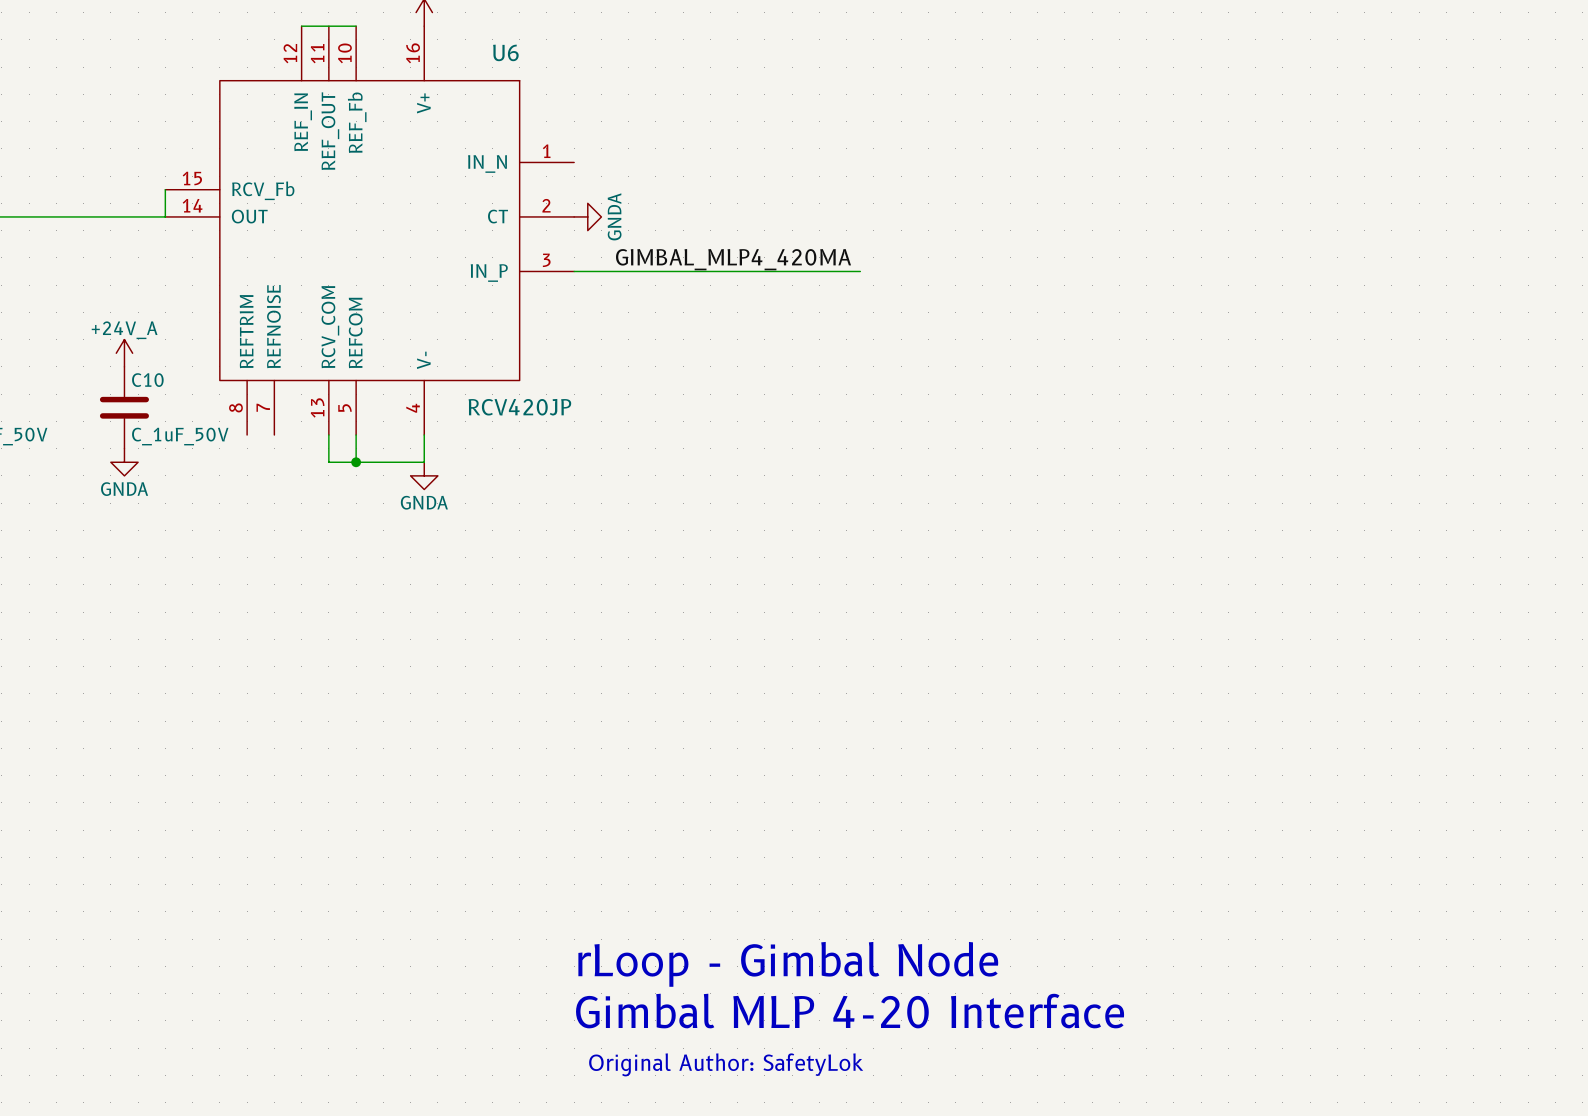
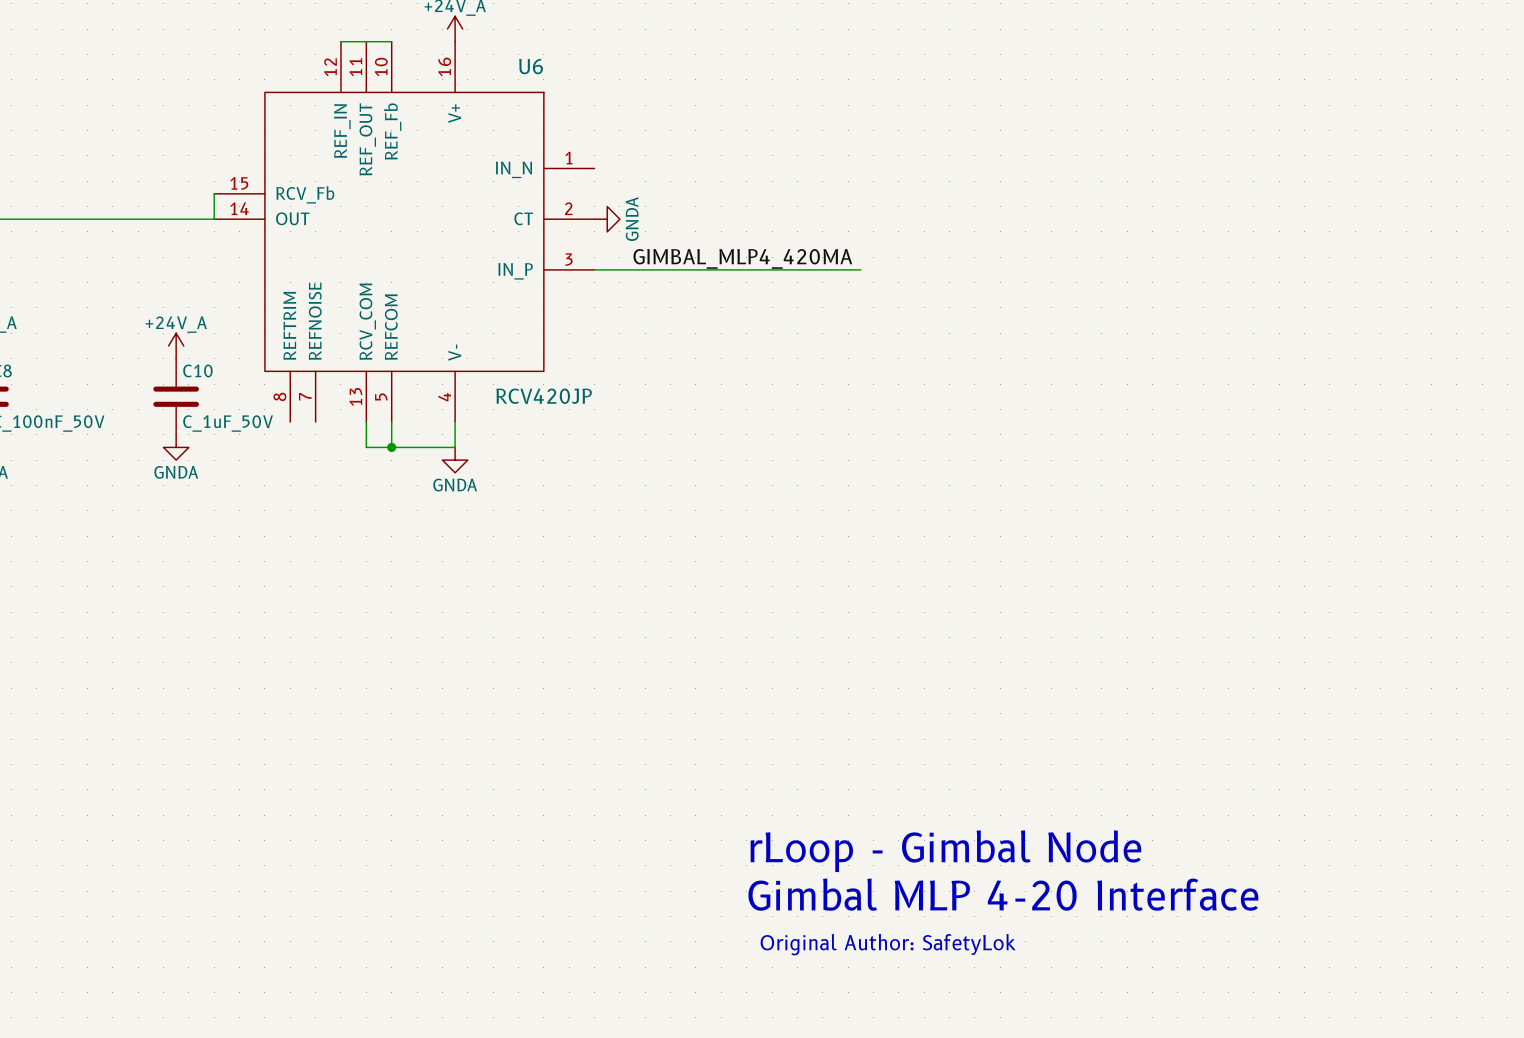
text position: rLoop - Gimbal Node (788, 964) -> rLoop - Gimbal Node (945, 851)
text position: Gimbal MLP 4-20 Interface (850, 1011) -> Gimbal MLP 4-20 Interface (1003, 894)
text position: Original Author: SafetyLok (726, 1064) -> Original Author: SafetyLok (888, 944)

